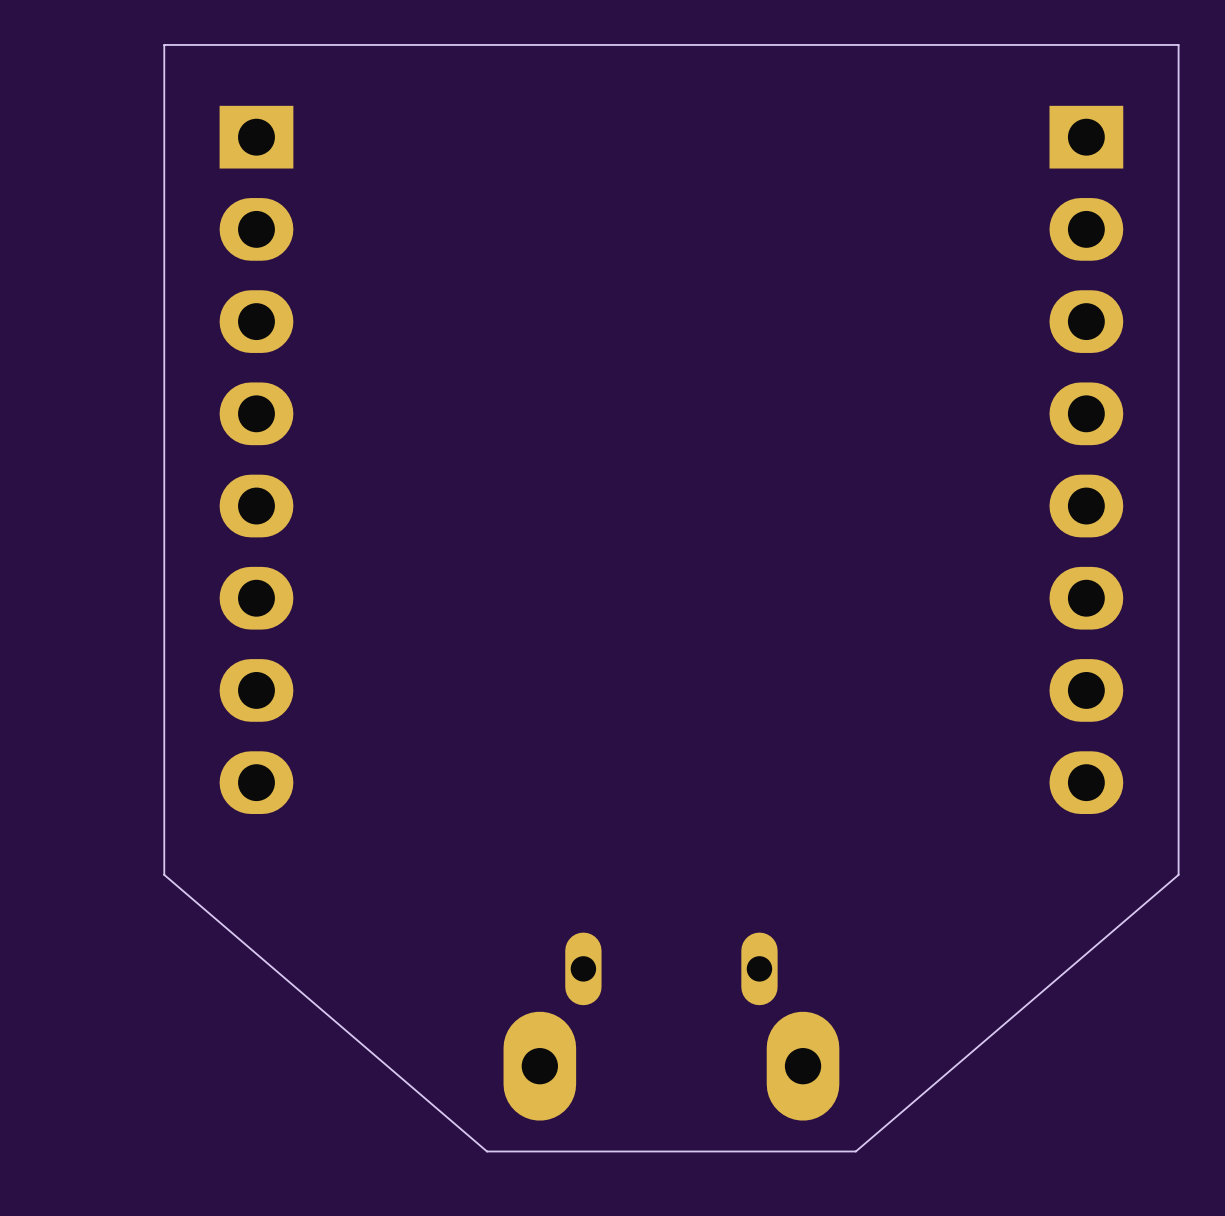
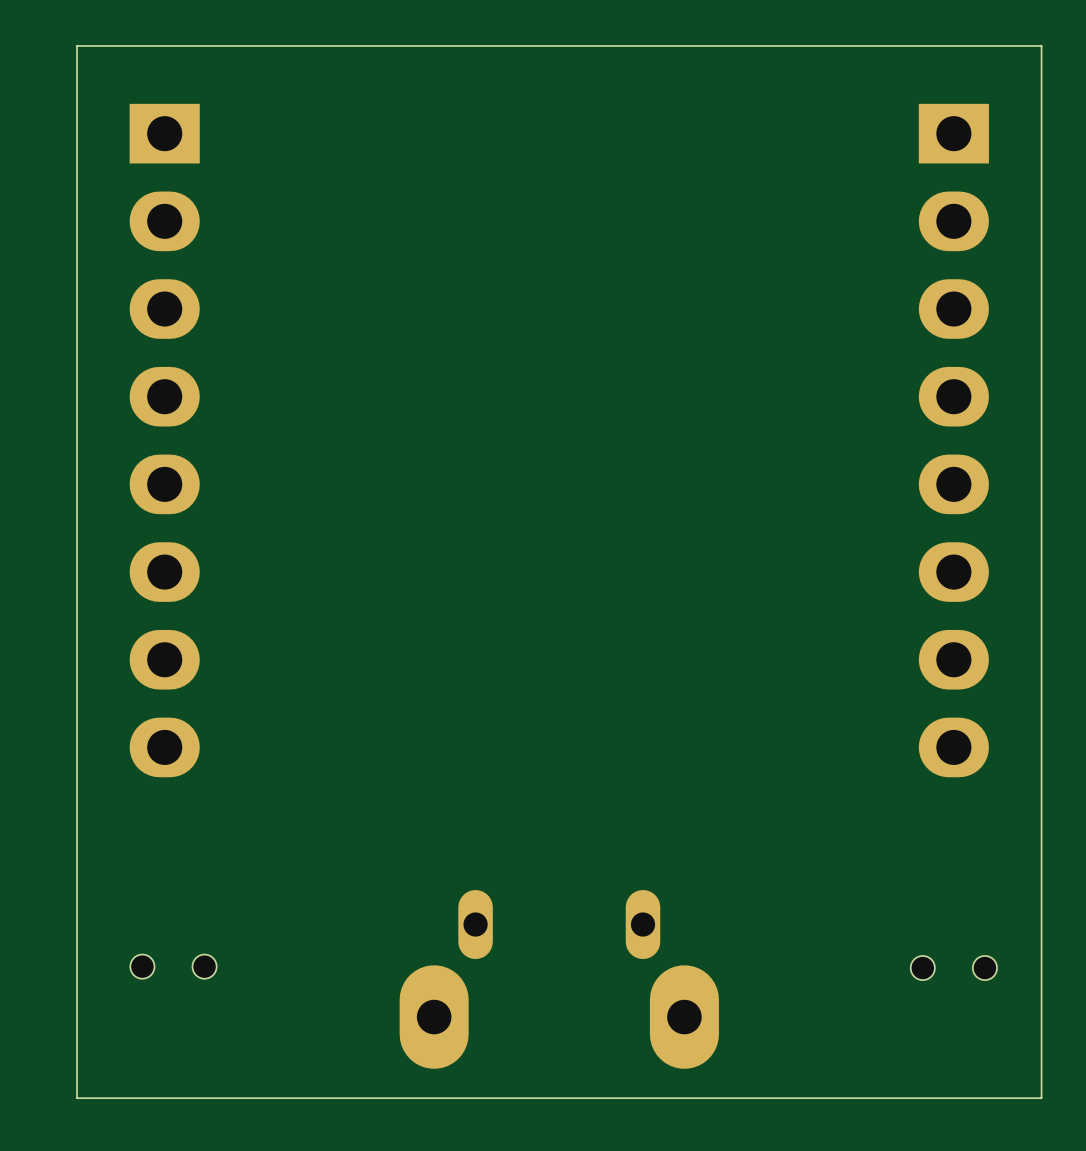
board edge: (164, 874) (487, 1151) -> (77, 835) (77, 1098) (383, 1098)
board edge: (1178, 874) (855, 1151) -> (1041, 835) (1041, 1098) (734, 1098)
part: none -> (173, 966)
part: none -> (953, 968)

